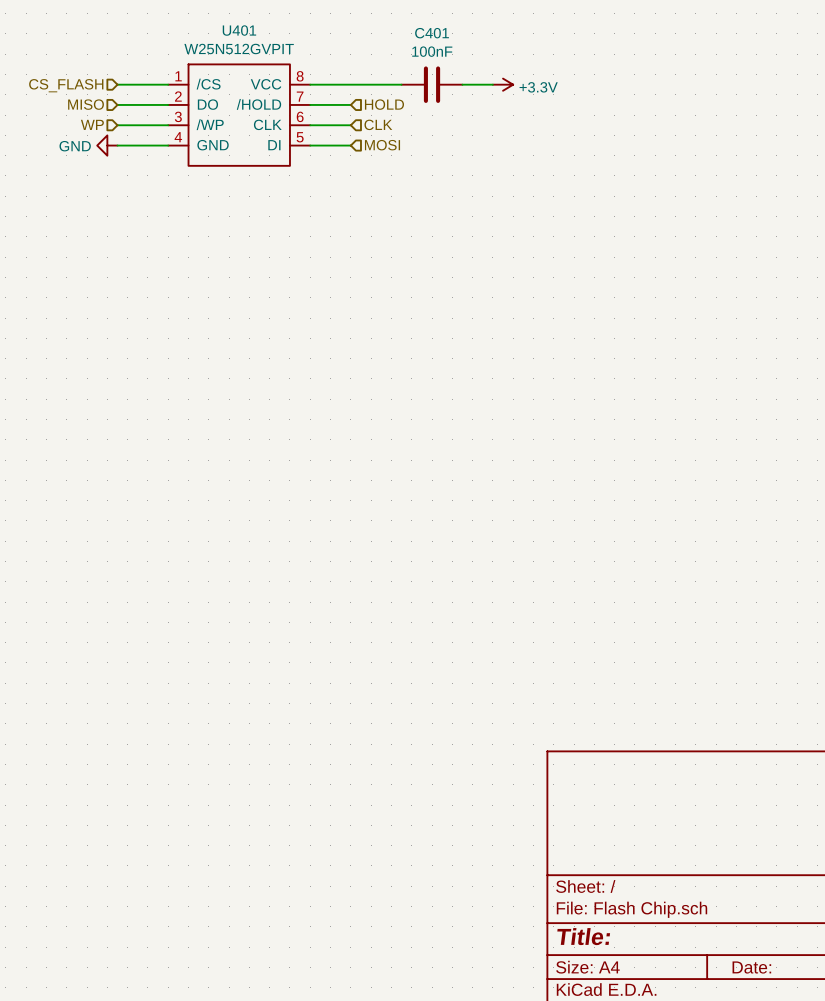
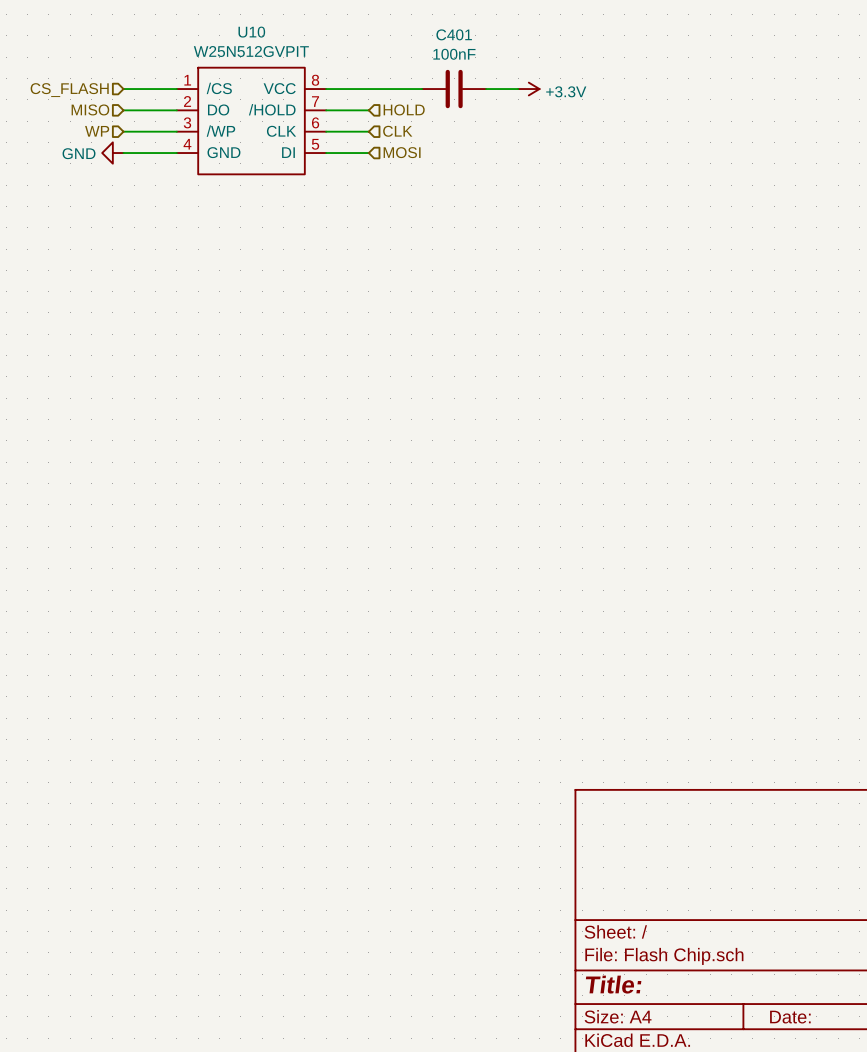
U401 name: U401 (239, 30) -> U10 (251, 32)

